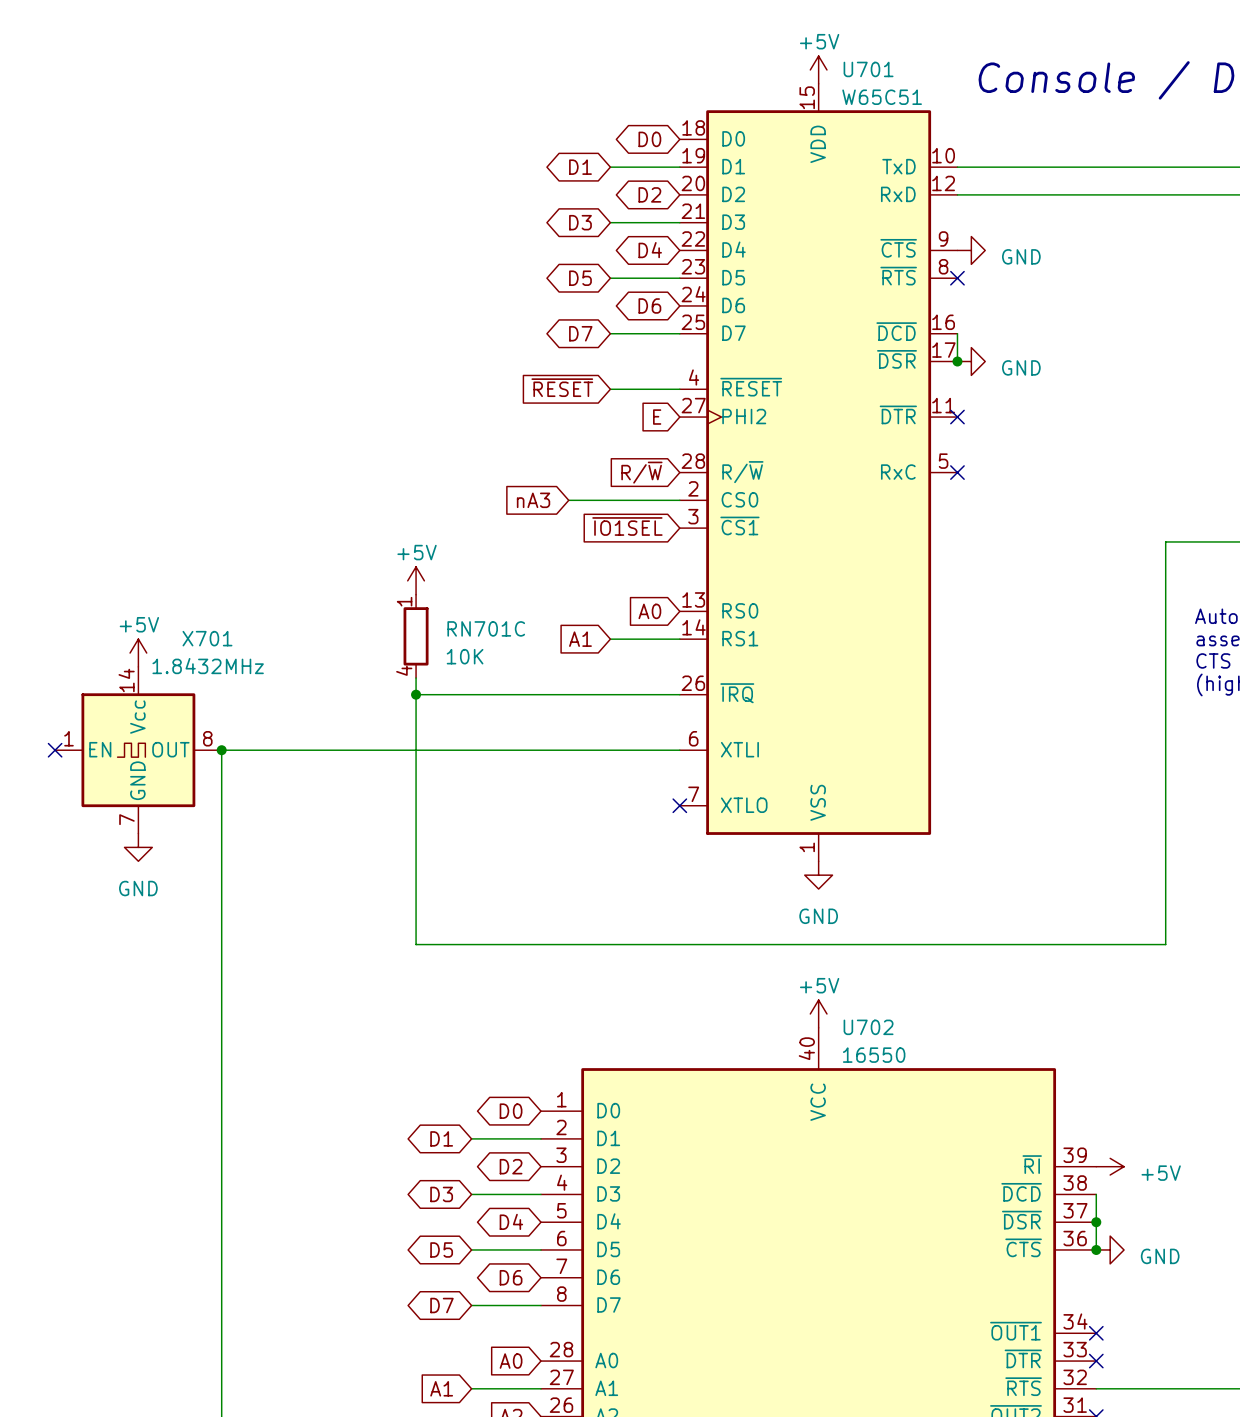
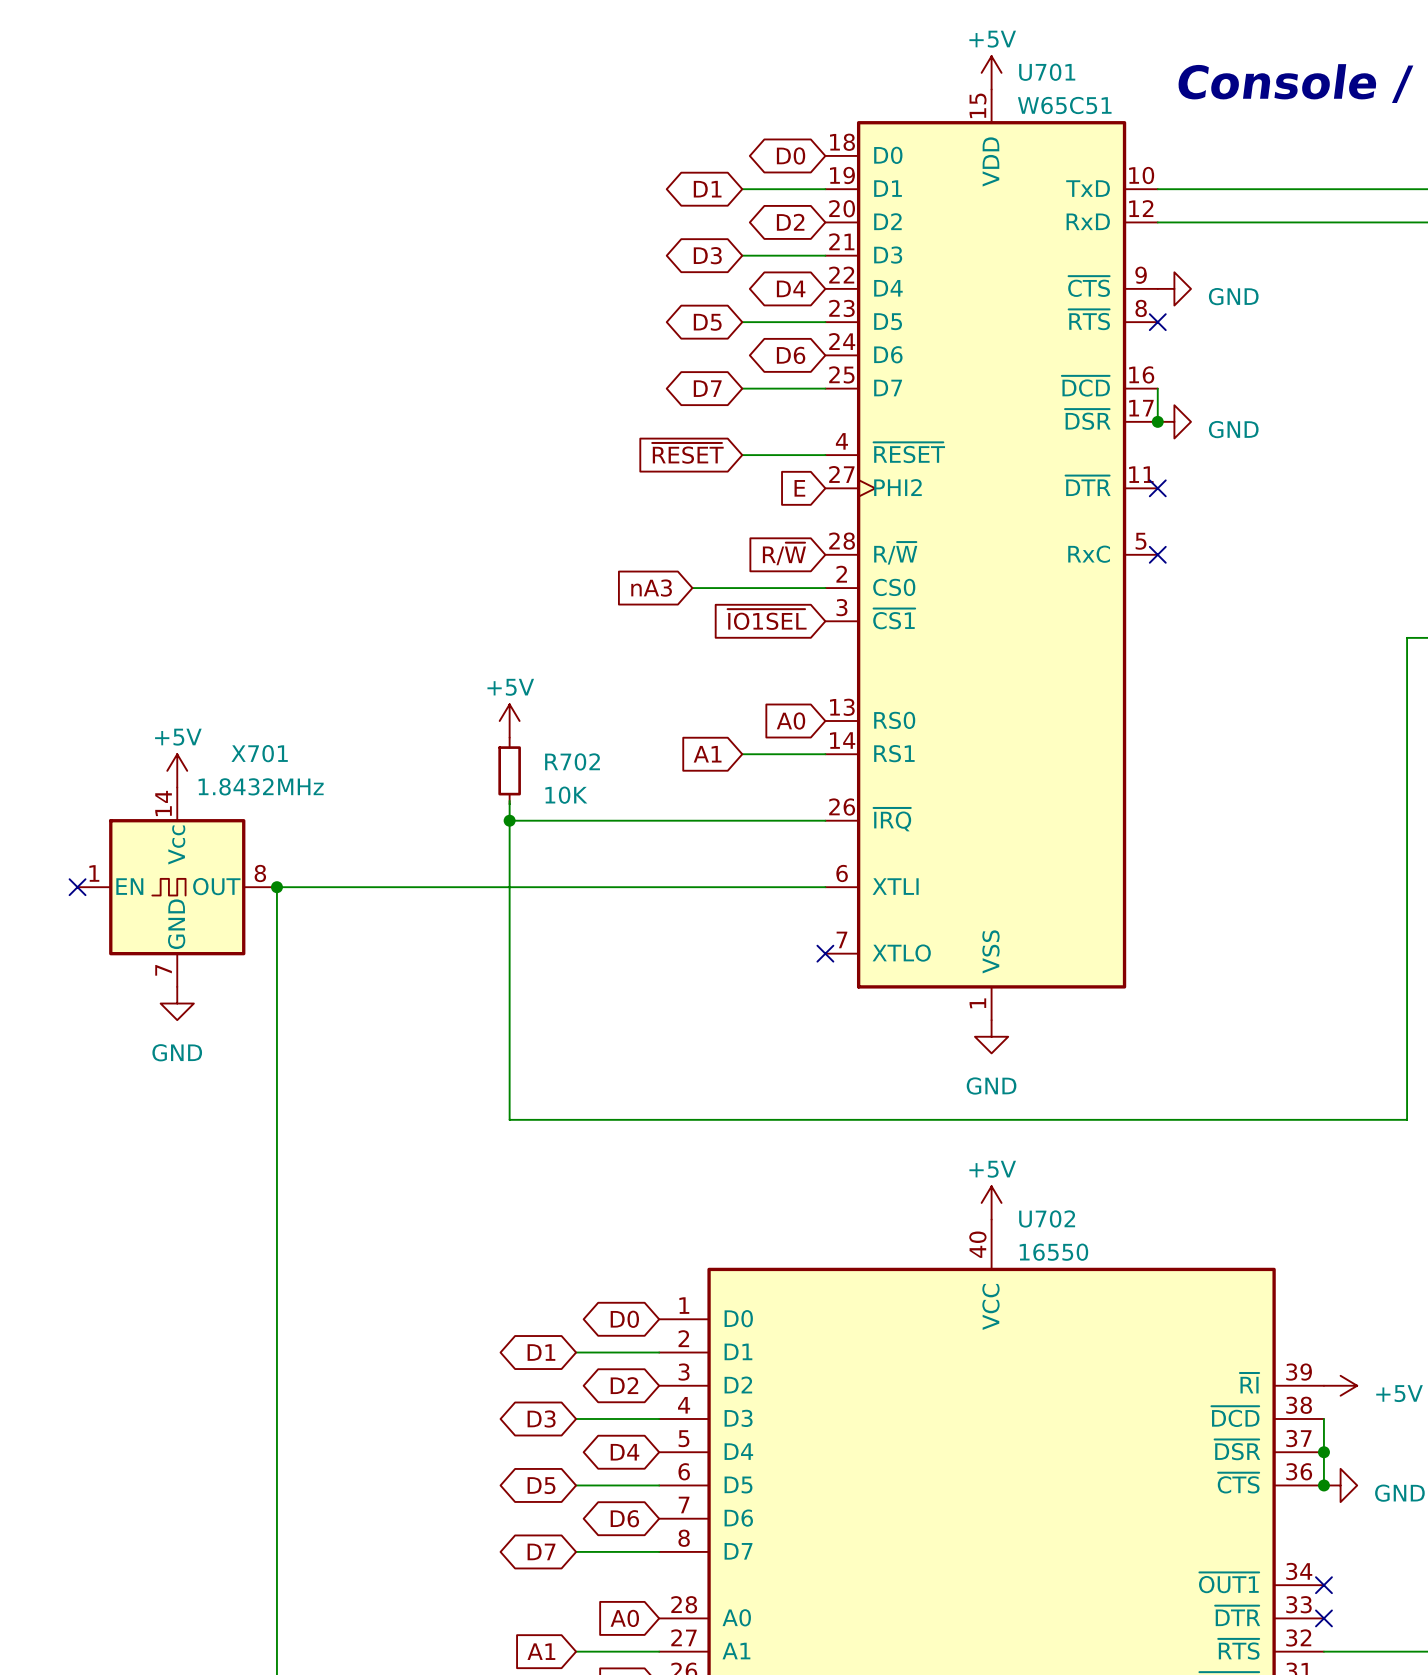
power symbol position: +5V (416, 580) -> +5V (509, 721)
RN701C: 10K (416, 636) -> none
R702: none -> 10K (509, 770)

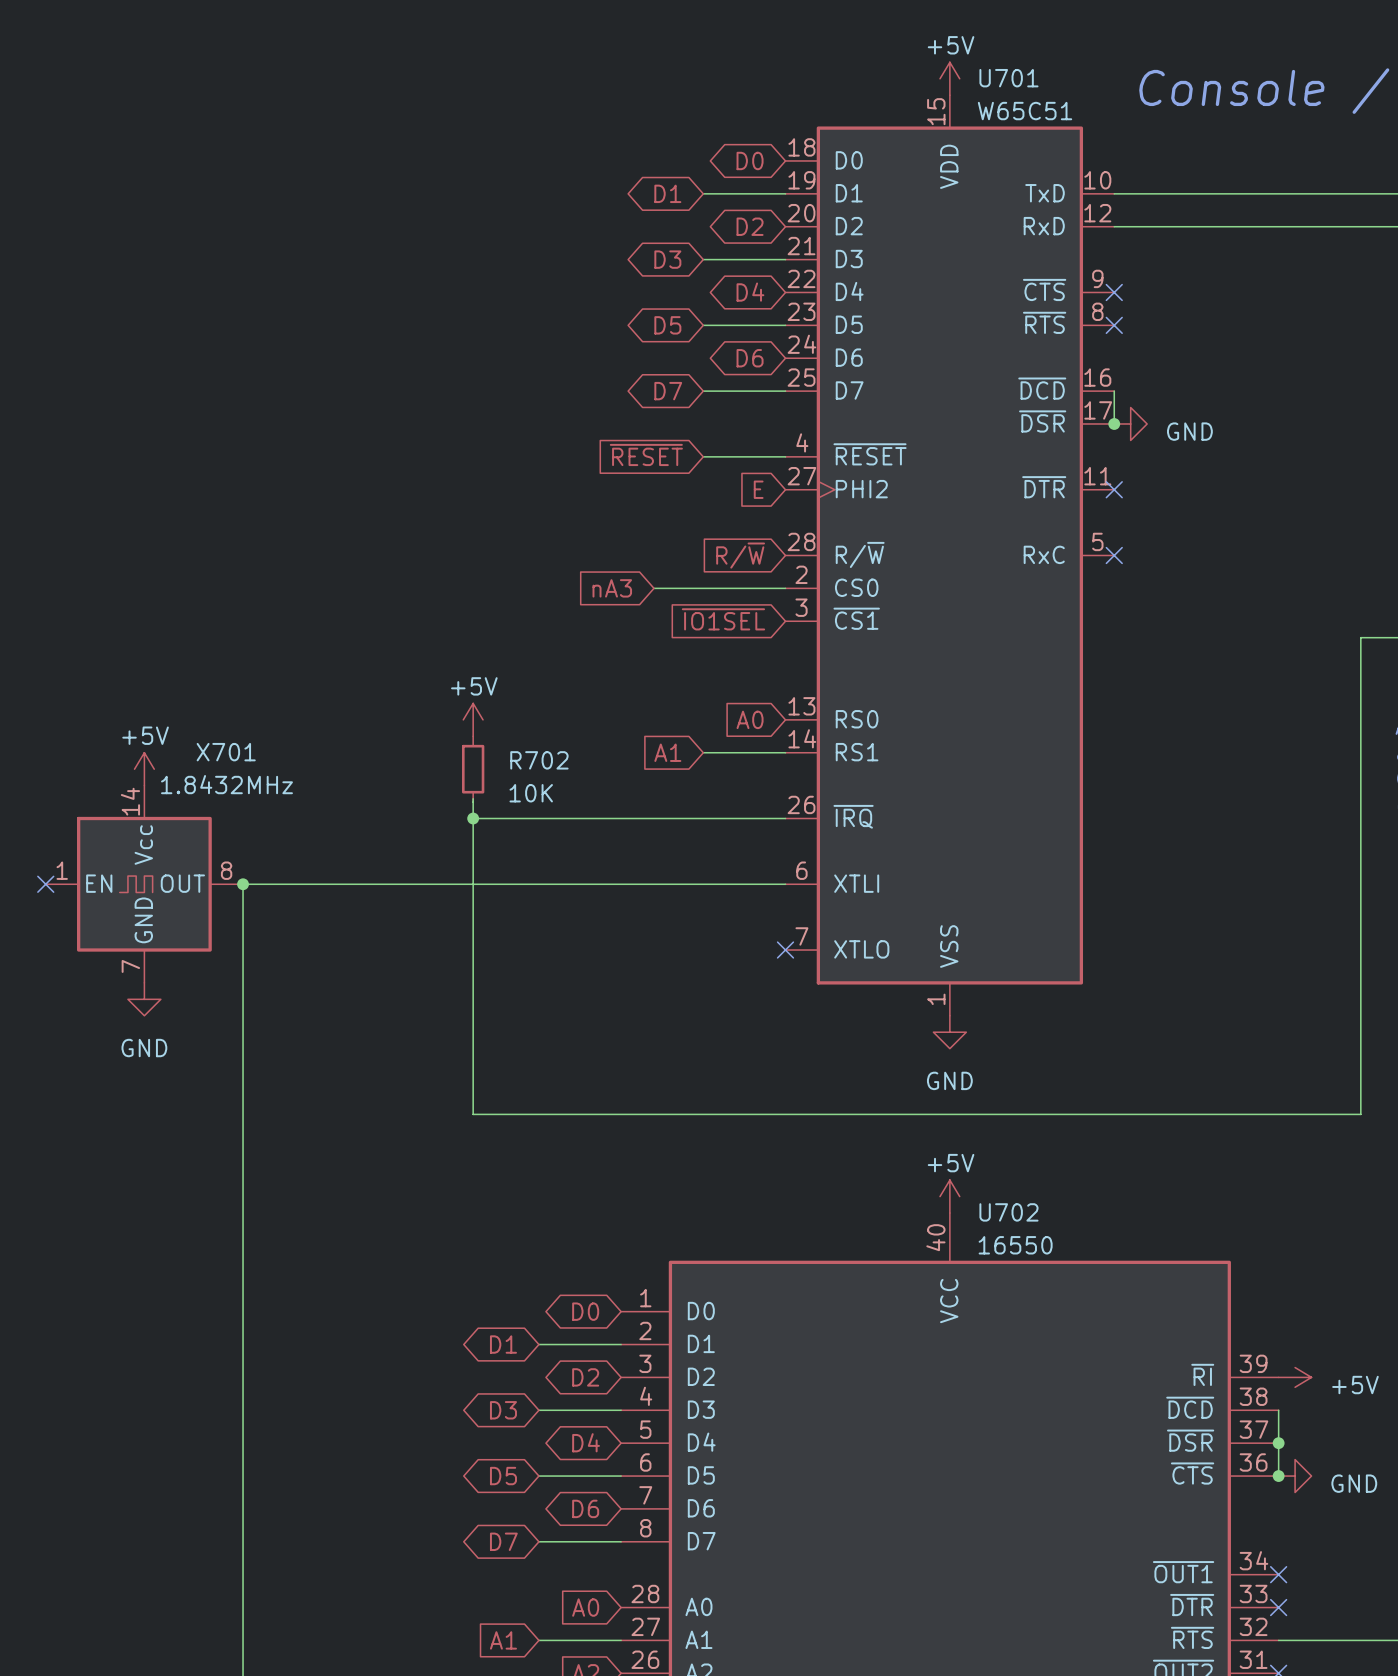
no-connect mark: none -> (1114, 292)
power symbol: GND (1174, 288) -> none

